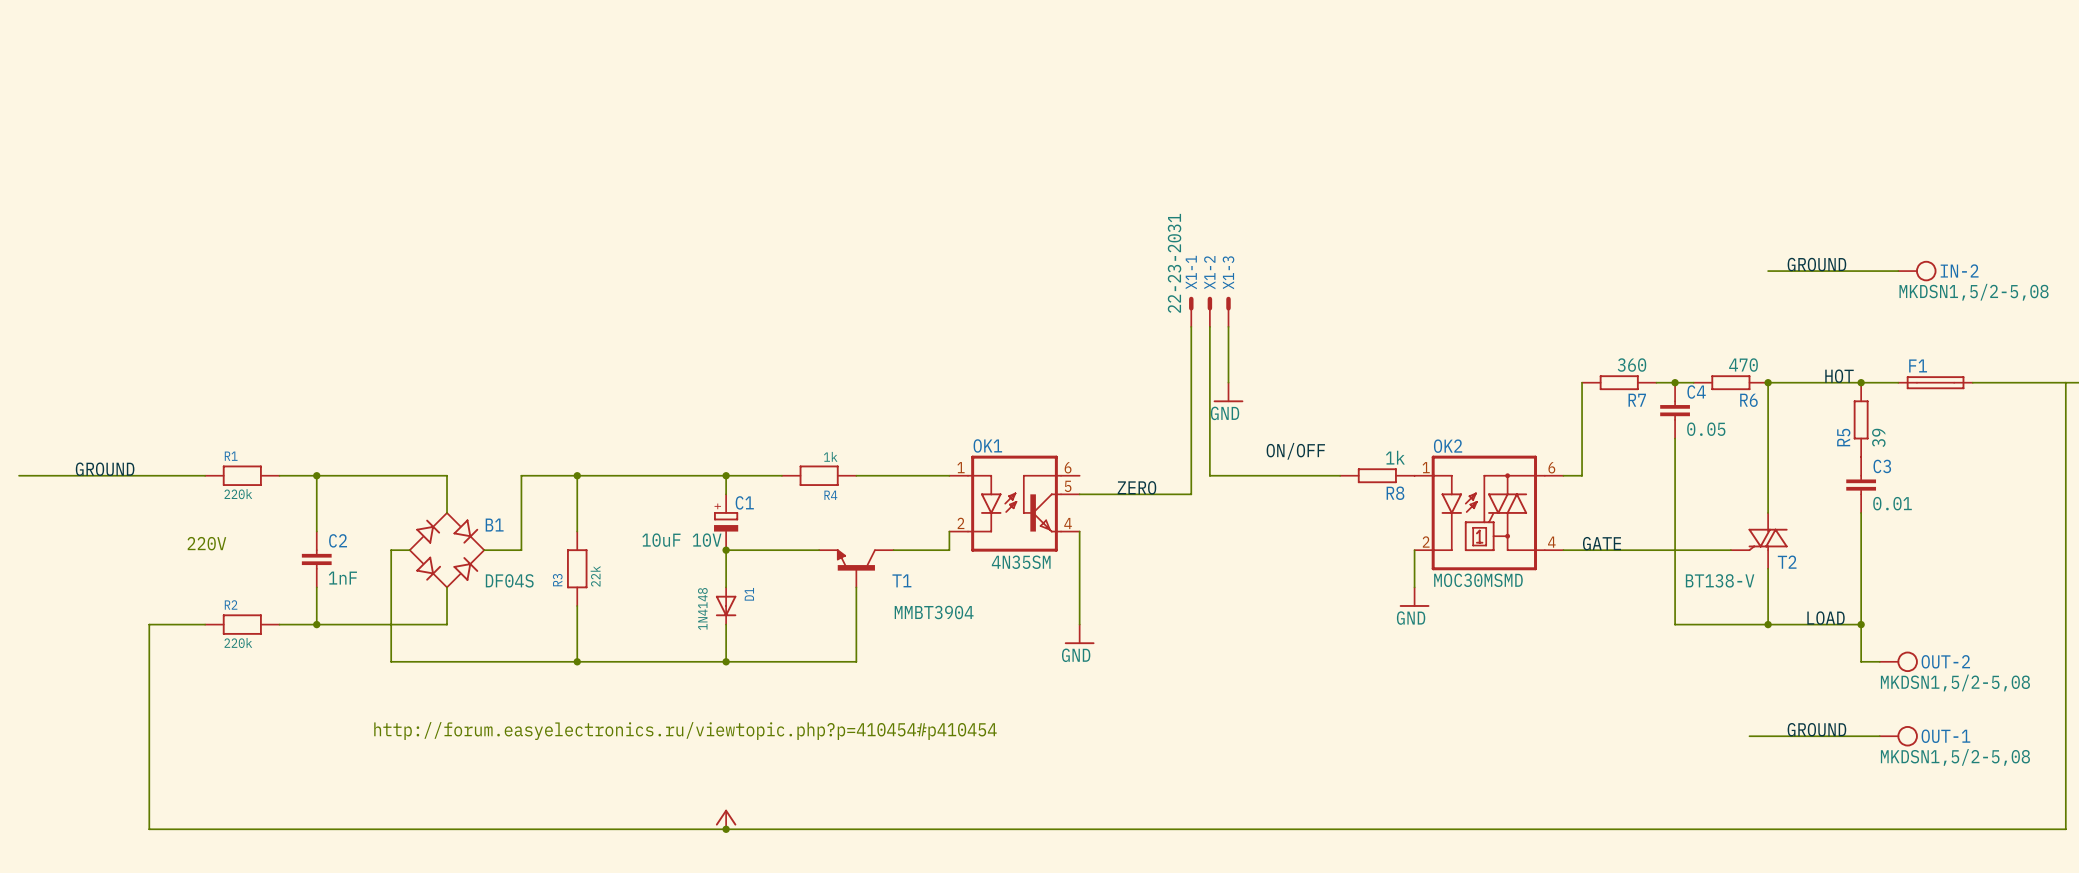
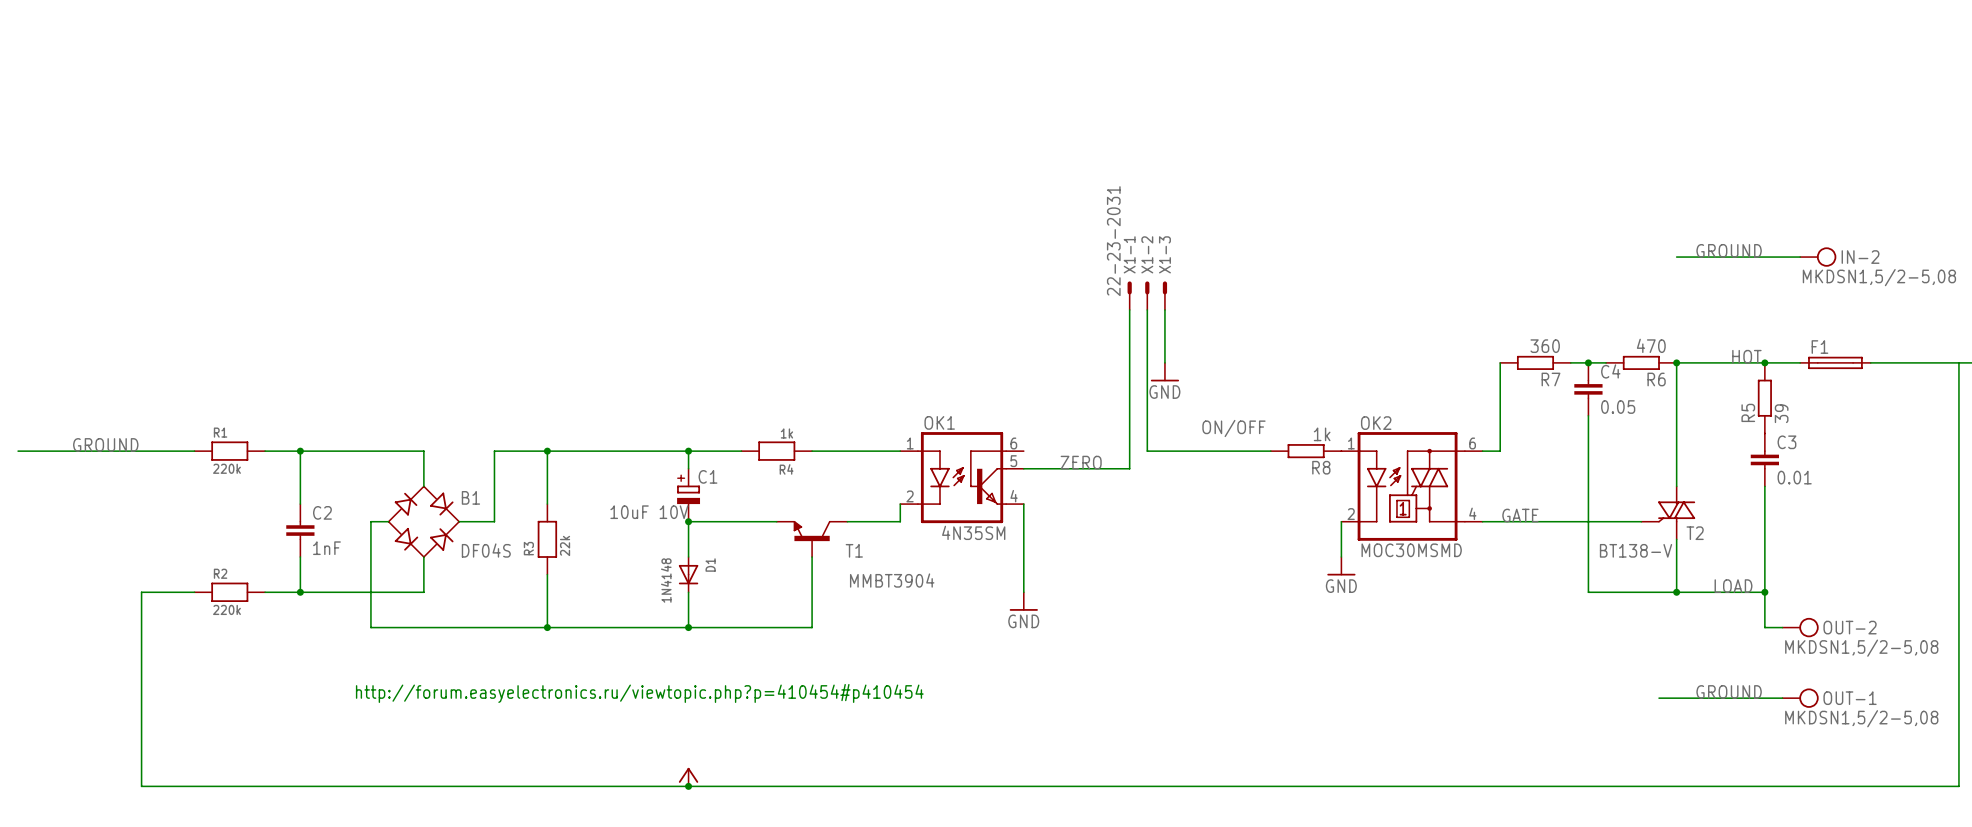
text: 220V (206, 543) -> none

